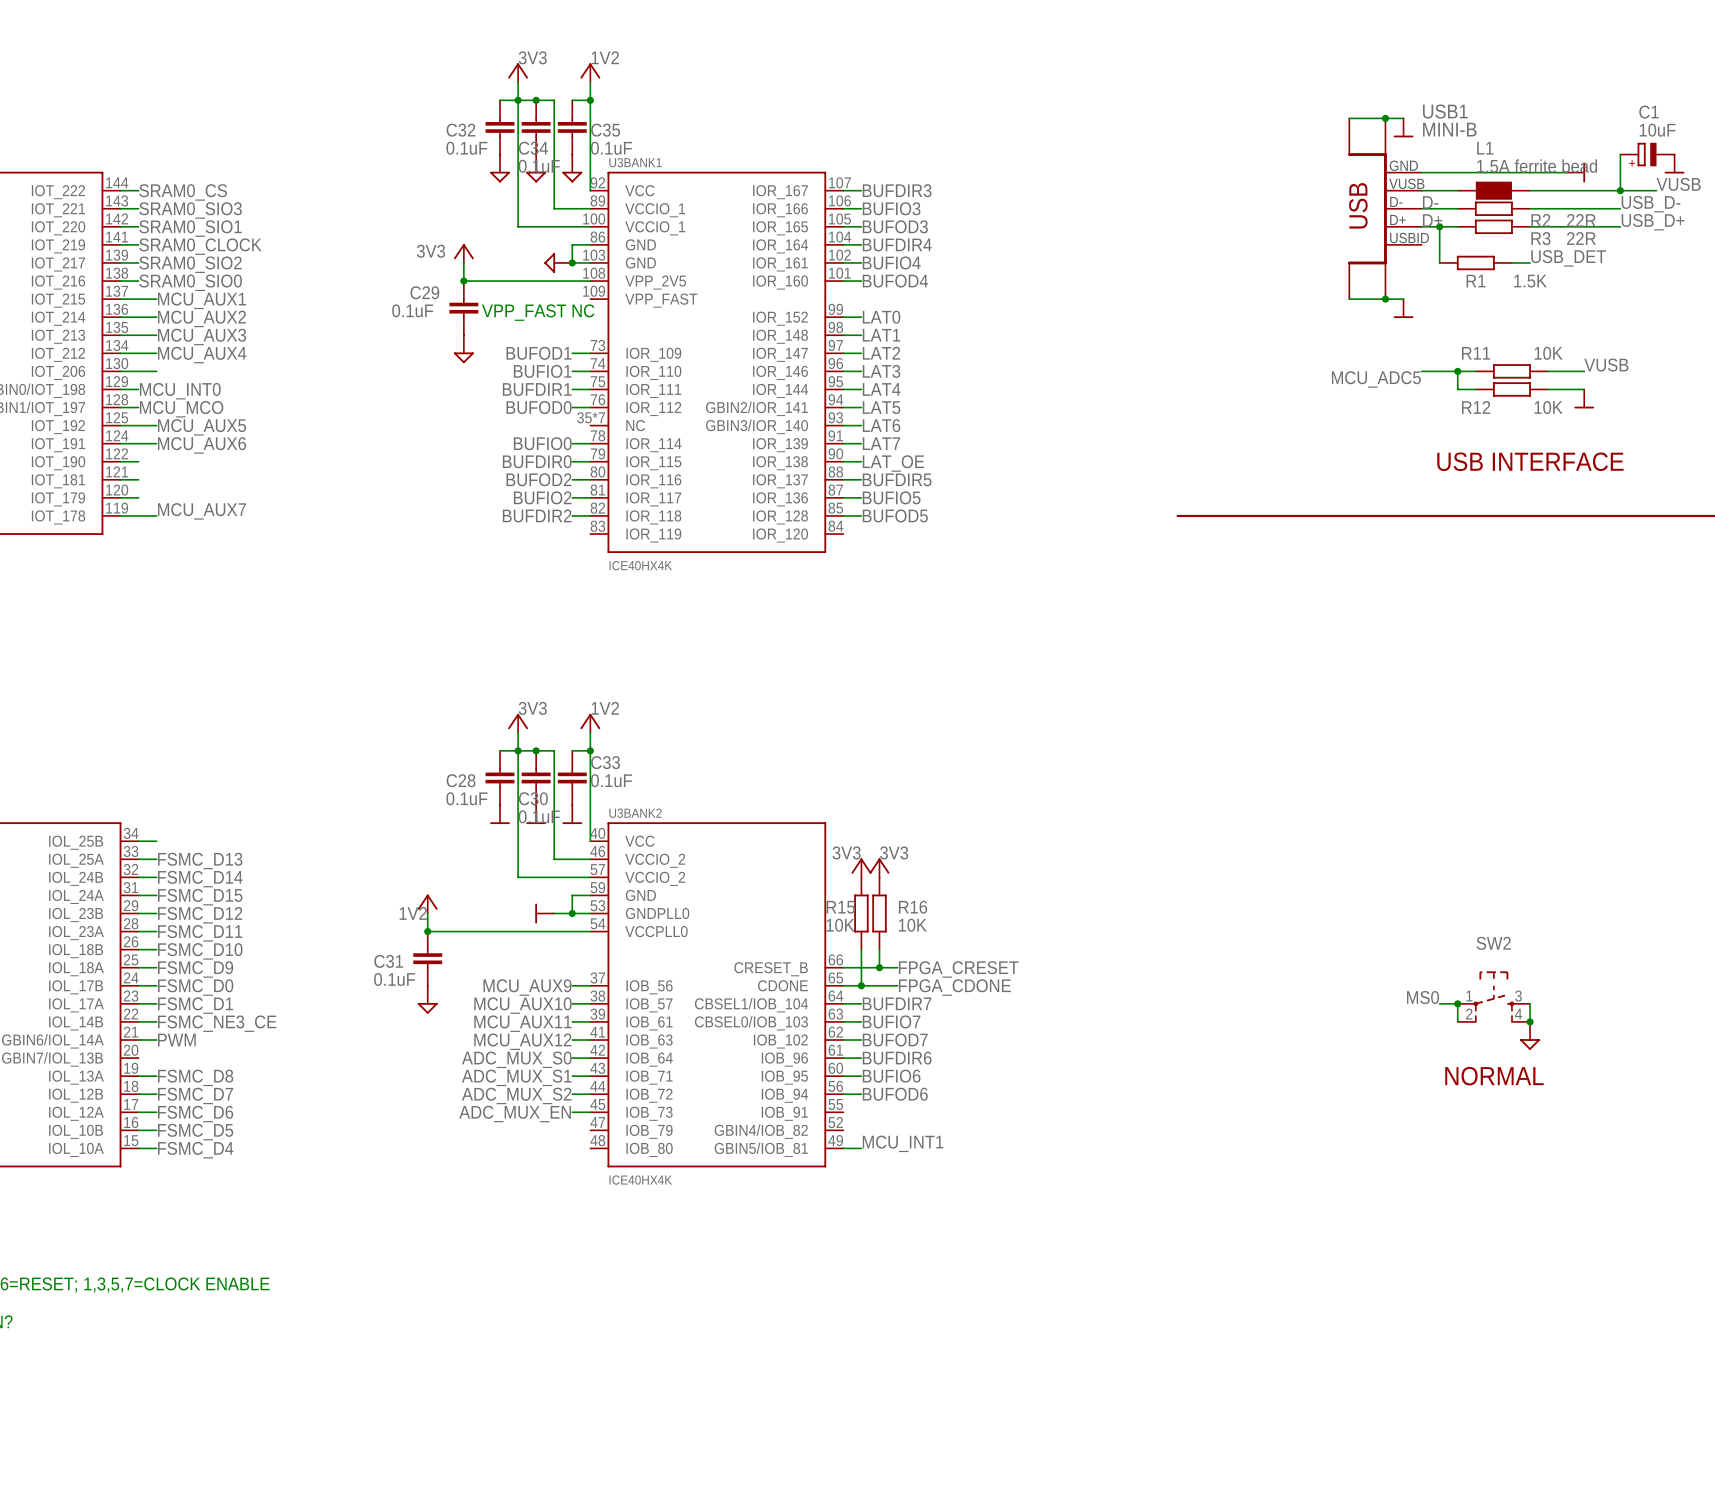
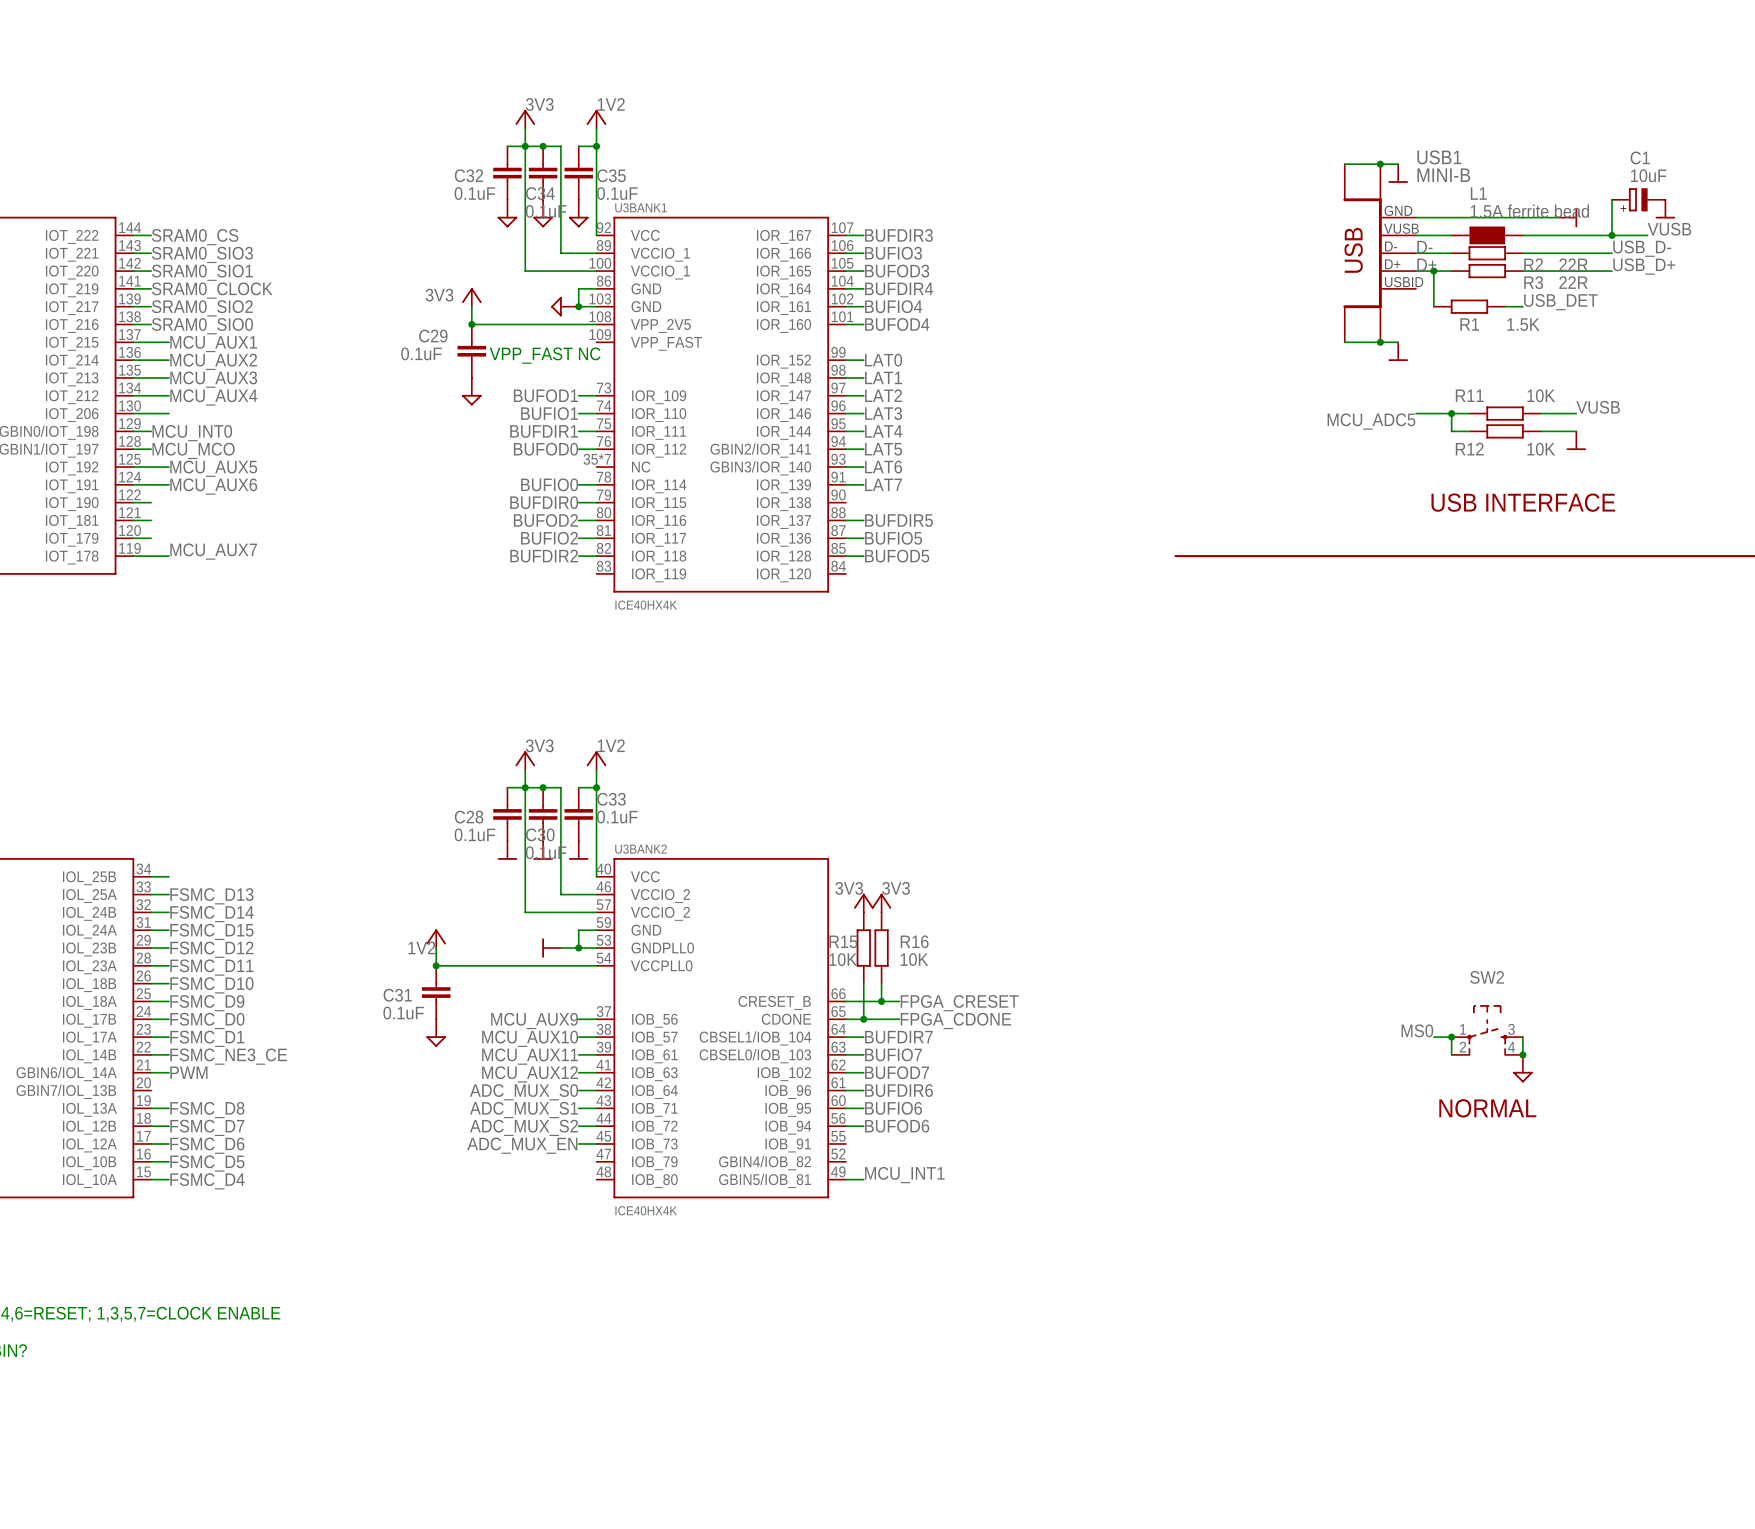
wire: (843, 461) (861, 461) -> none
label: LAT_OE (893, 463) -> none

